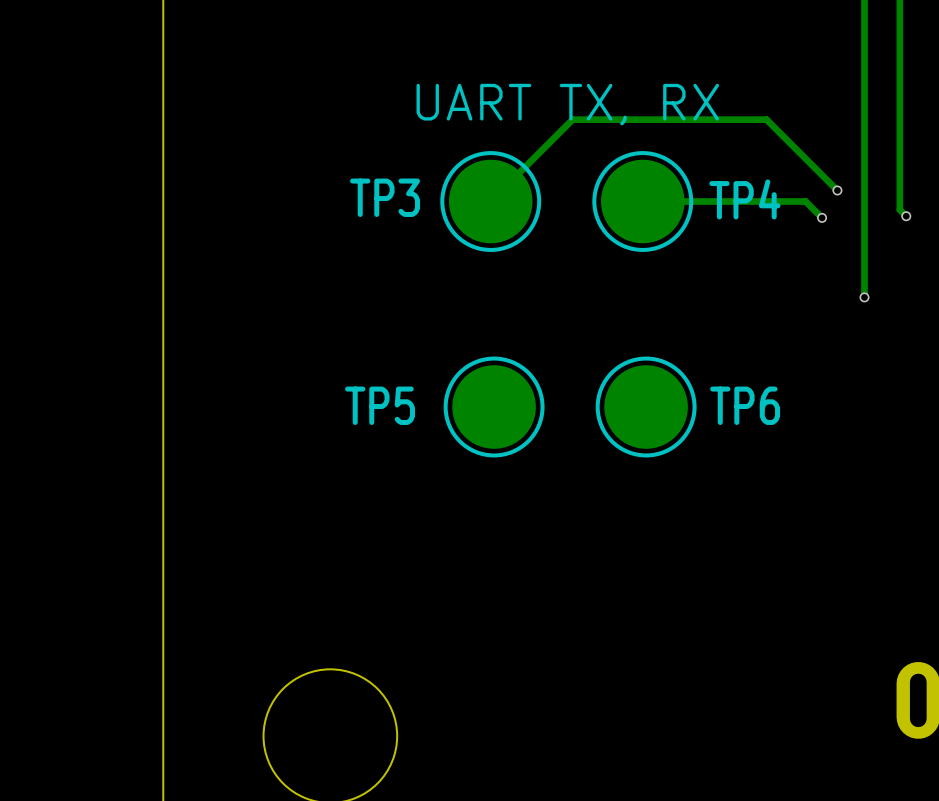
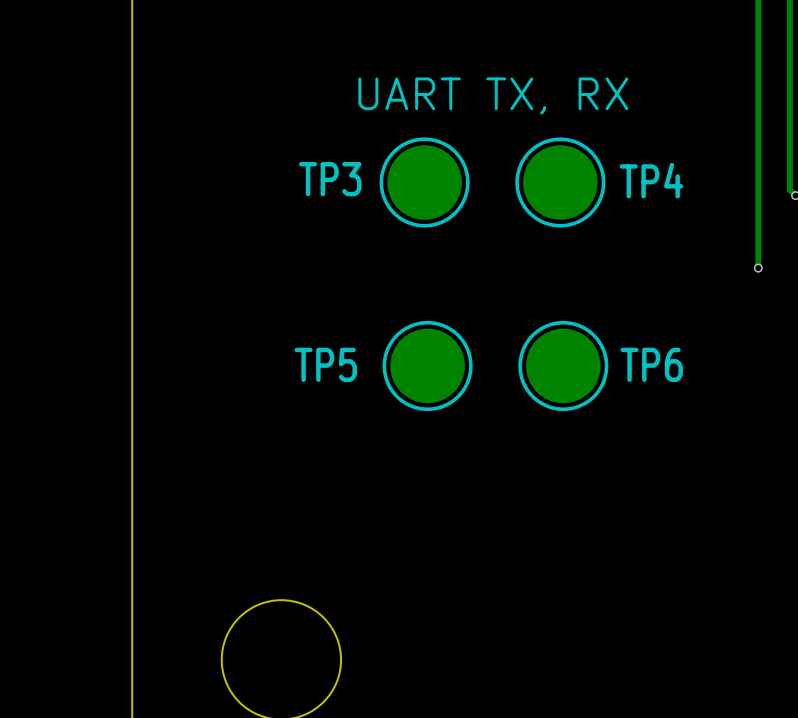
track: (837, 190) (766, 119) (572, 119) (490, 201) -> none
via: (837, 190) -> none
track: (642, 201) (805, 201) (822, 217) -> none
via: (822, 217) -> none

